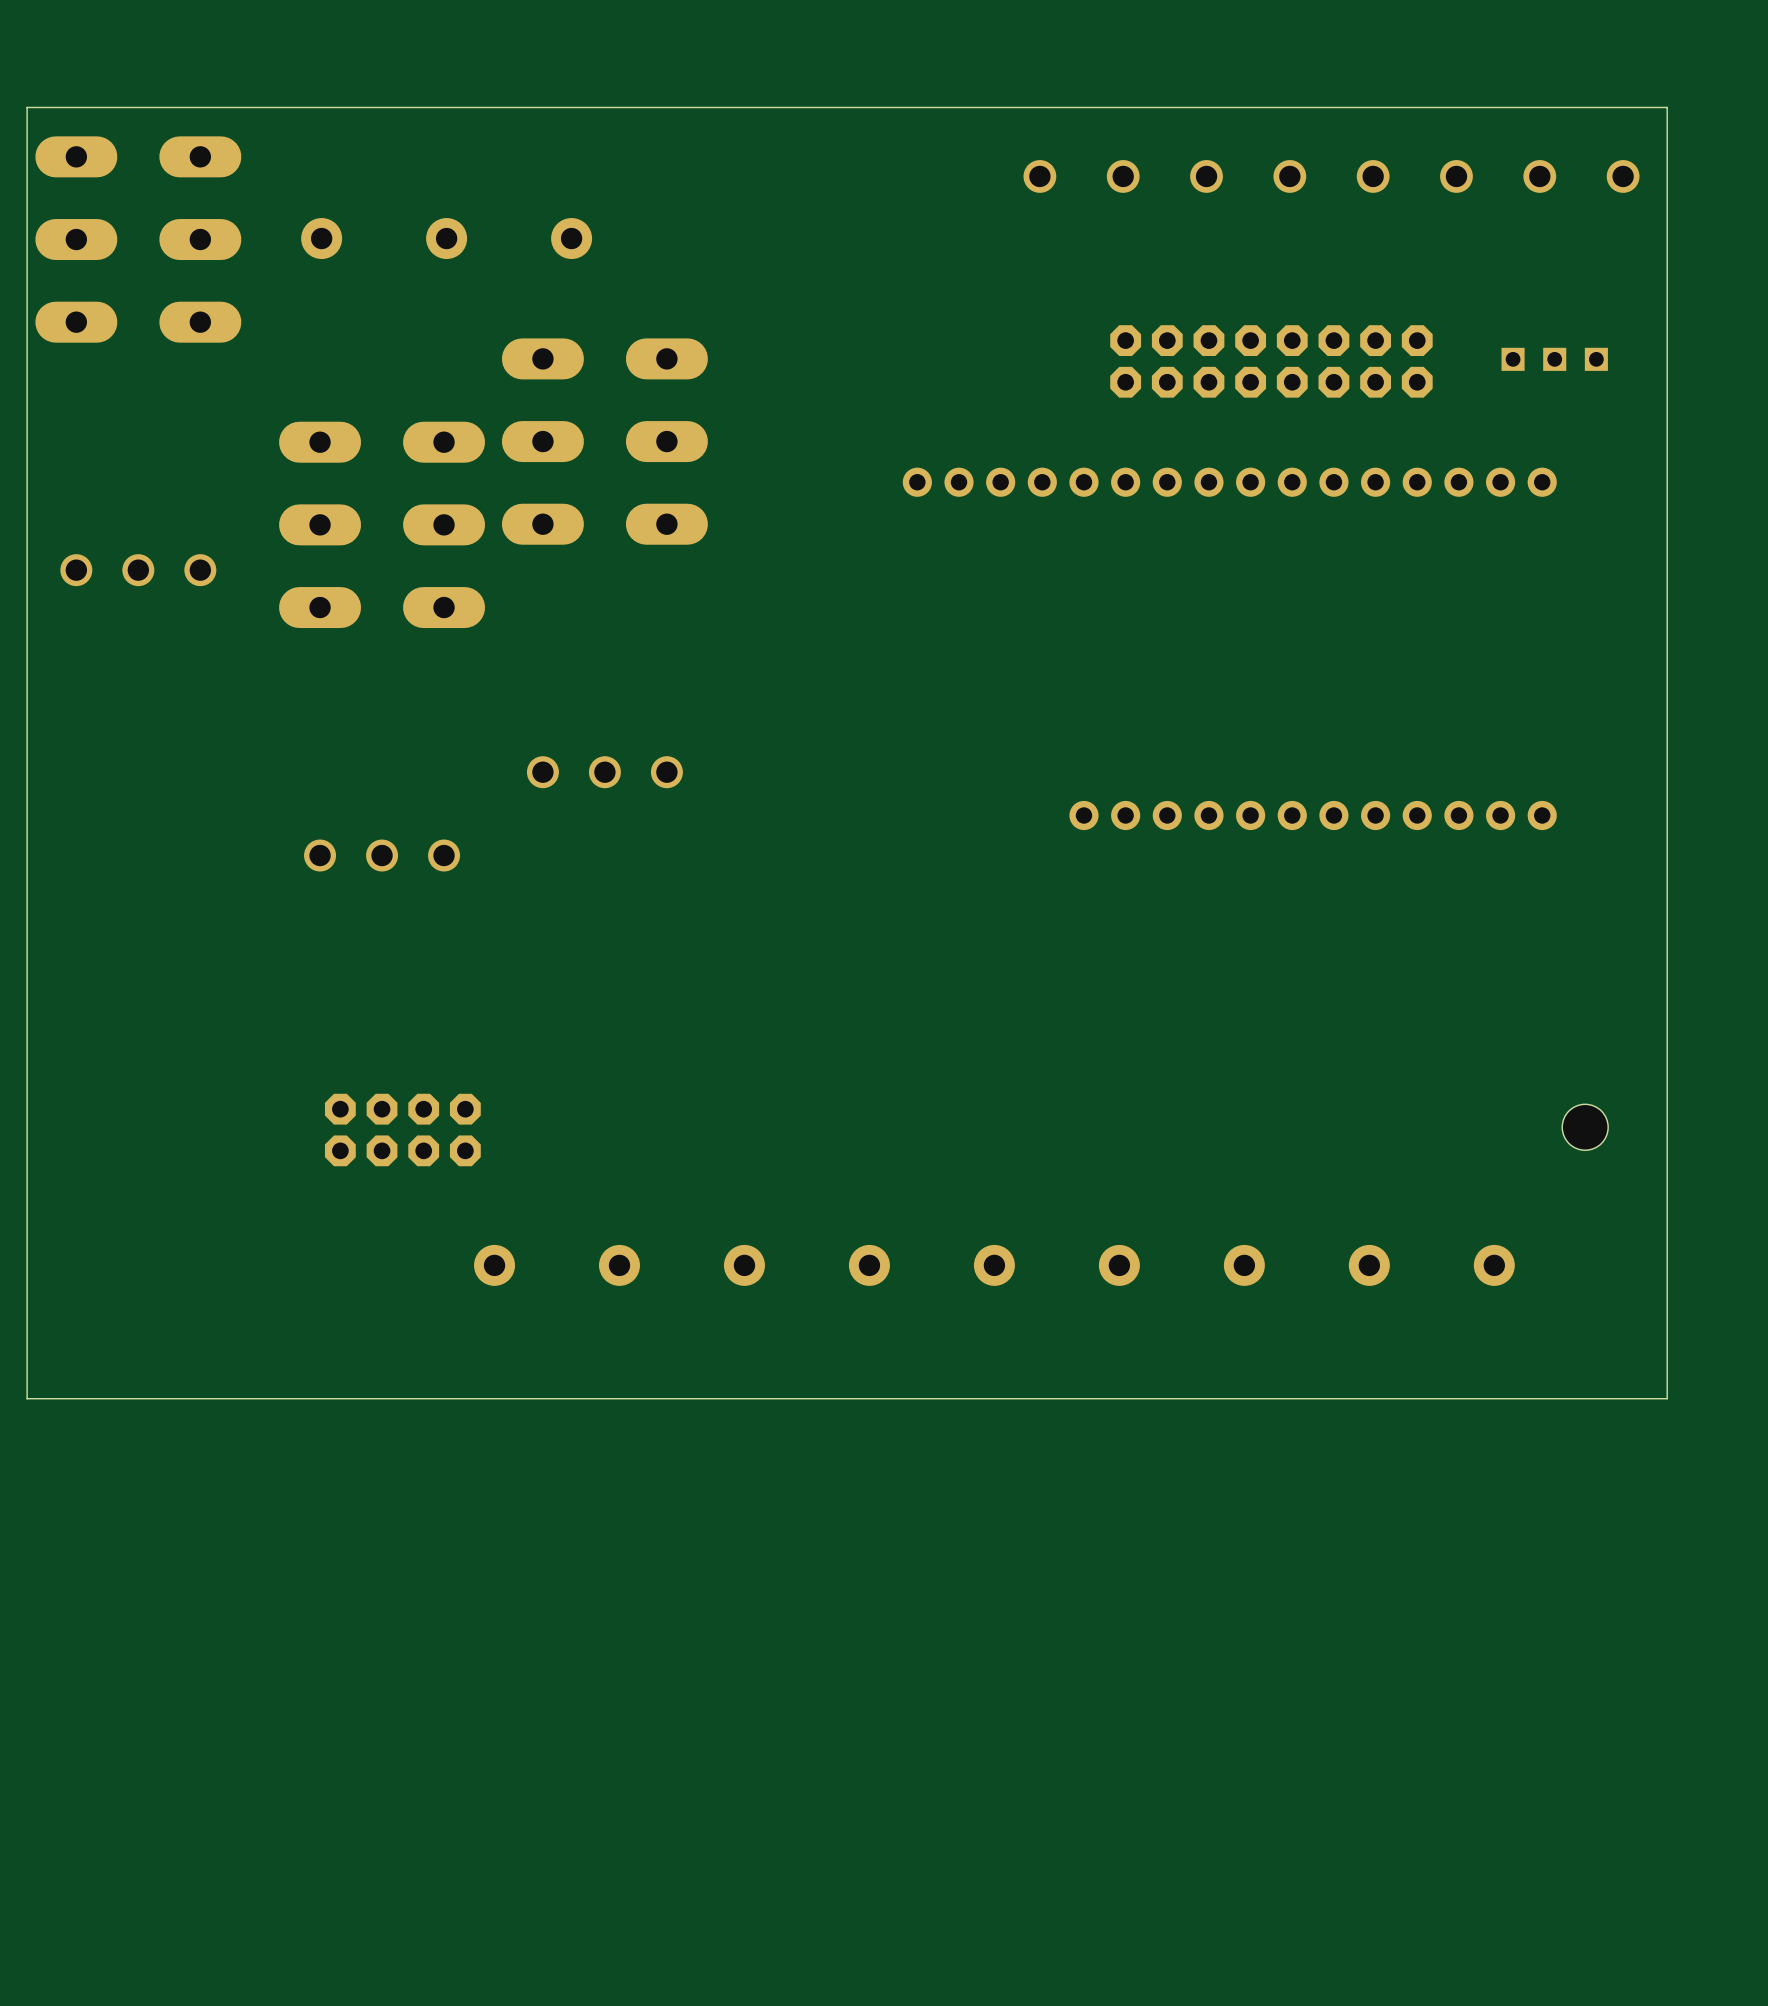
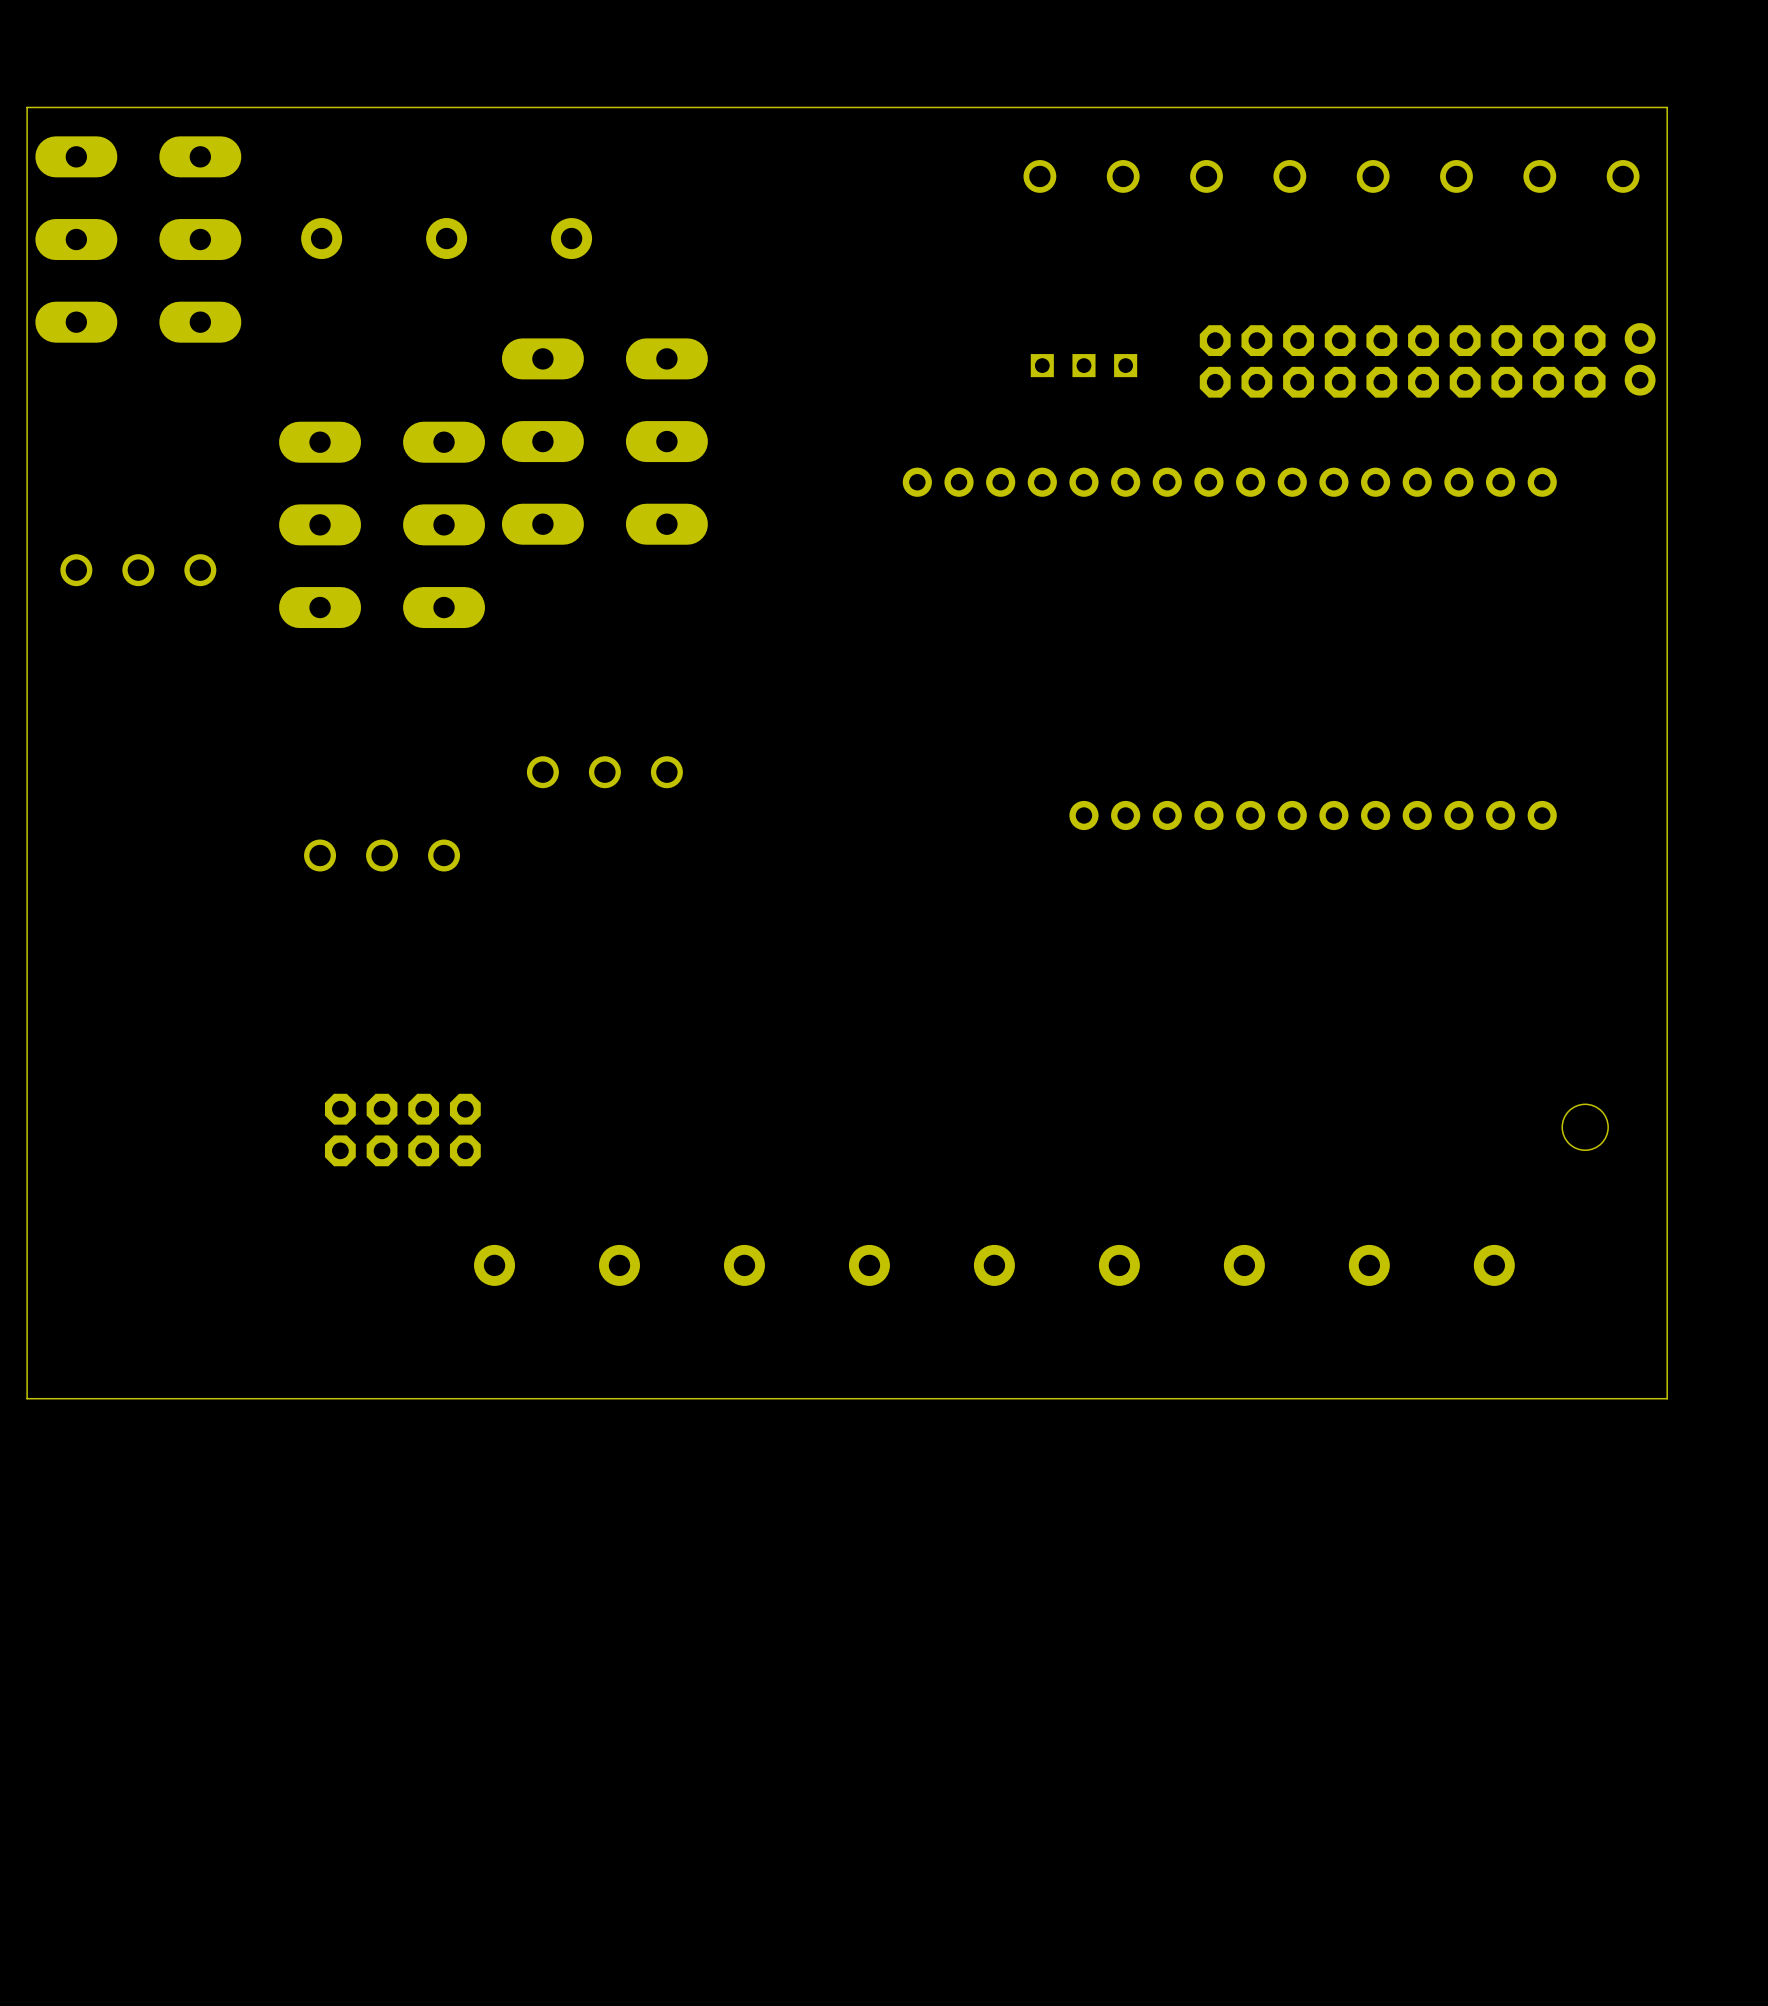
part: (1554, 359) -> none
part: none -> (1640, 359)
part: (1271, 361) -> none
part: none -> (1402, 361)
part: none -> (1083, 365)

